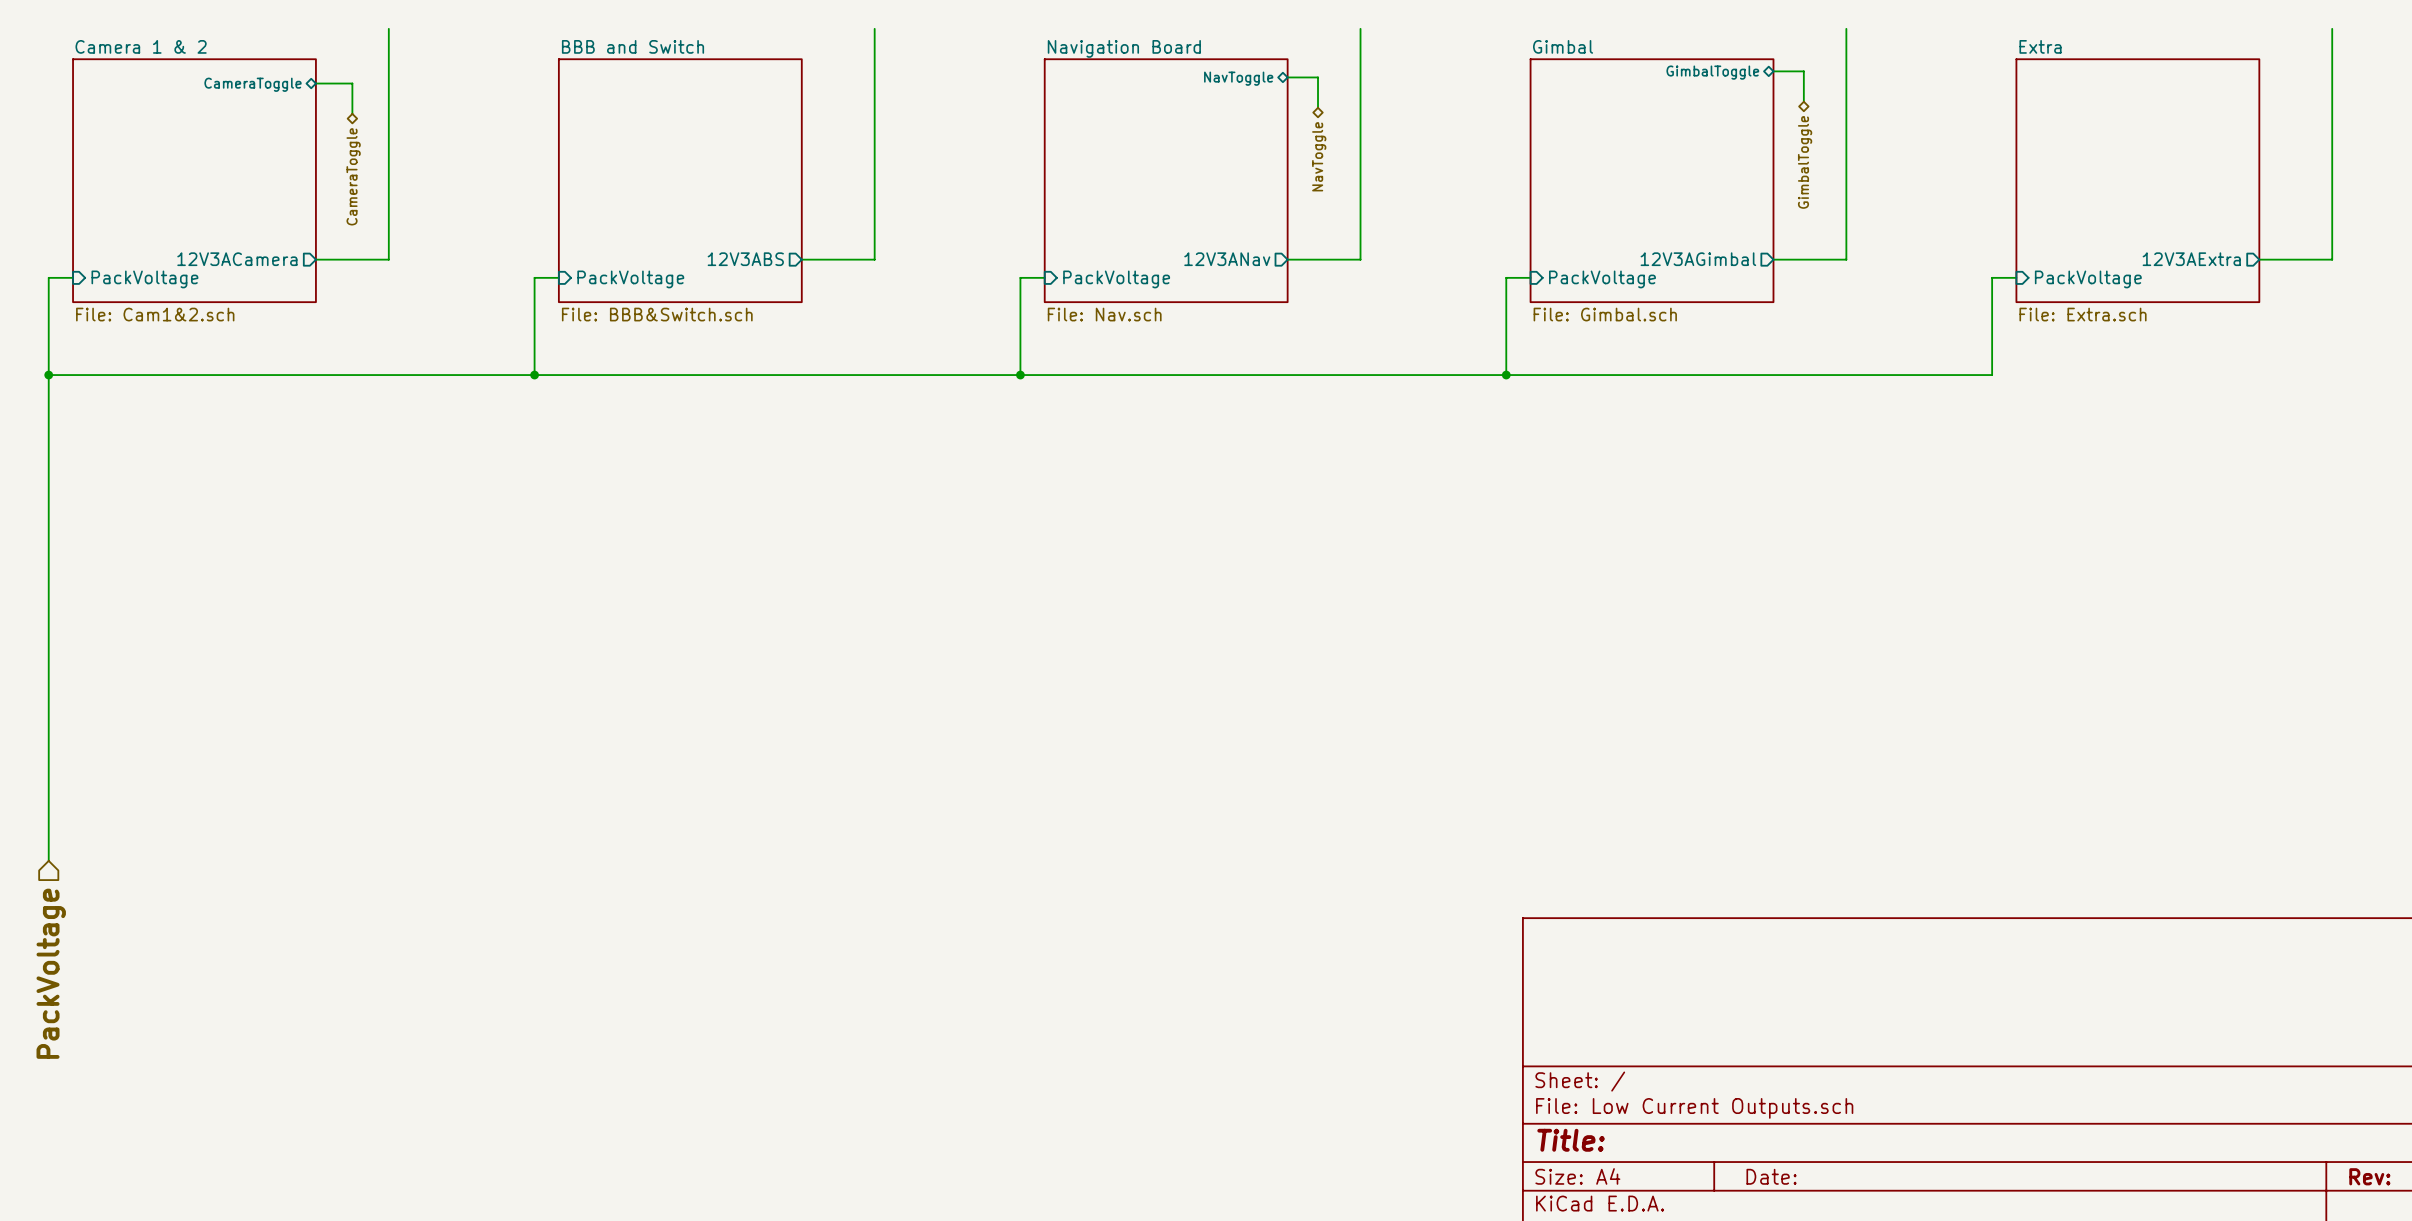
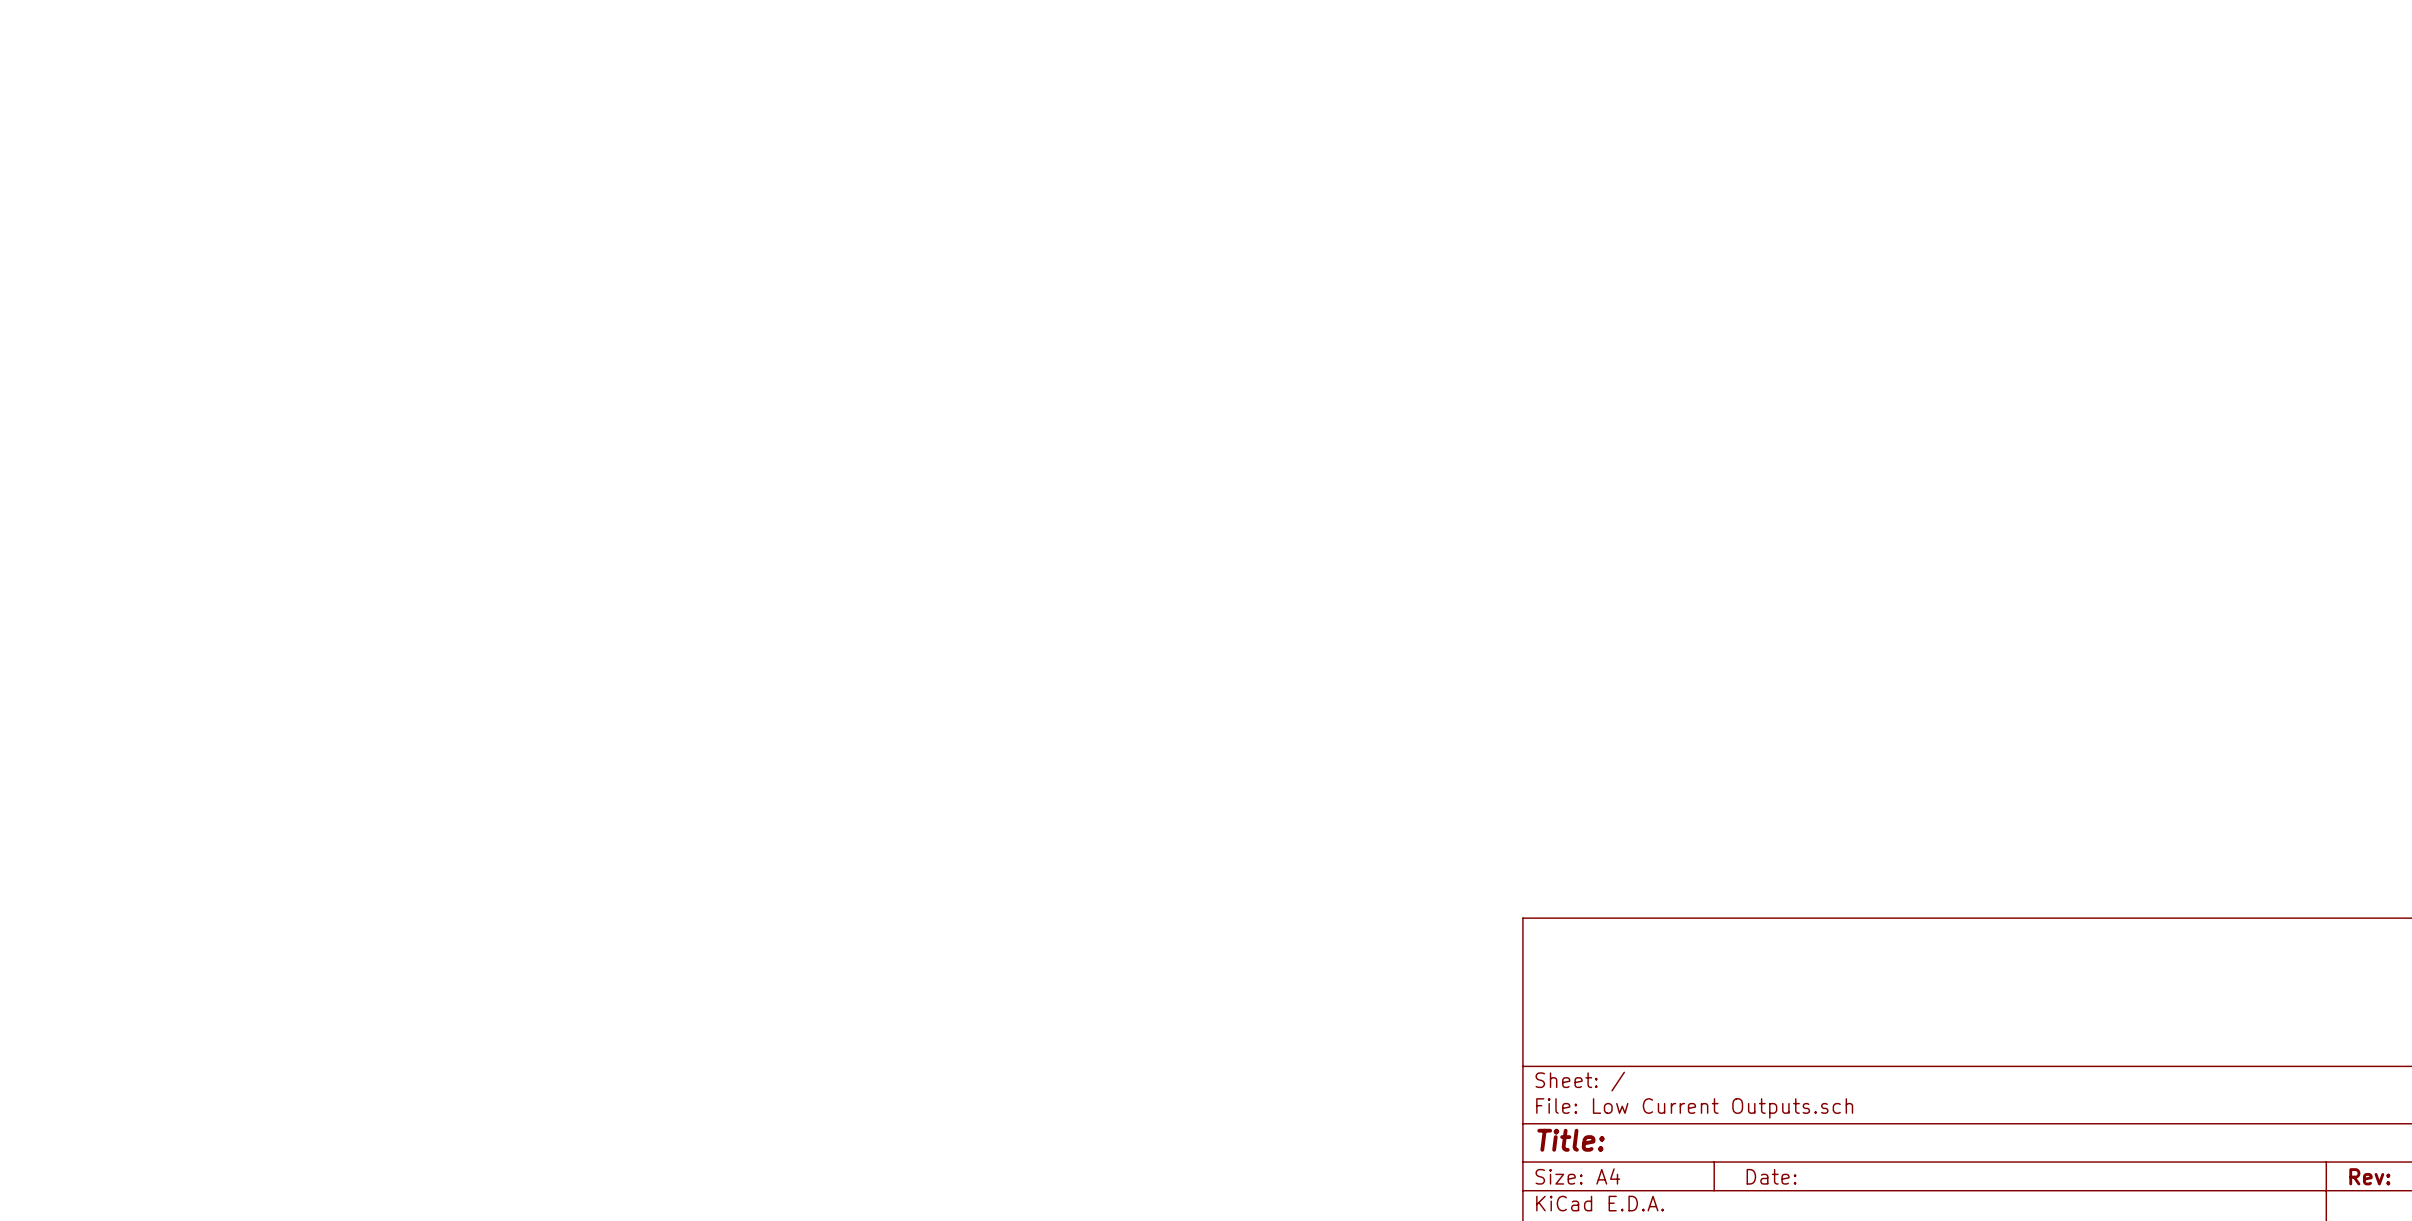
wire: (388, 28) (388, 259) (315, 259) -> none
wire: (874, 28) (874, 259) (801, 259) -> none
wire: (1360, 28) (1360, 259) (1287, 259) -> none
wire: (1846, 28) (1846, 259) (1773, 259) -> none
wire: (2332, 28) (2332, 259) (2259, 259) -> none
wire: (1773, 71) (1803, 71) (1803, 101) -> none
sheet pin: GimbalToggle (1712, 72) -> none
wire: (1287, 77) (1318, 77) (1318, 107) -> none
sheet pin: NavToggle (1238, 78) -> none
wire: (315, 83) (352, 83) (352, 113) -> none
sheet pin: CameraToggle (253, 84) -> none
hierarchical label: NavToggle (1319, 156) -> none
hierarchical label: GimbalToggle (1805, 162) -> none
hierarchical label: CameraToggle (353, 176) -> none
sheet Camera 1 & 2: File: Cam1&2.sch (194, 180) -> none
sheet BBB and Switch: File: BBB&Switch.sch (680, 180) -> none
sheet Navigation Board: File: Nav.sch (1166, 180) -> none
sheet Gimbal: File: Gimbal.sch (1652, 180) -> none
sheet Extra: File: Extra.sch (2137, 180) -> none
sheet pin: 12V3ACamera (237, 259) -> none
sheet pin: 12V3ABS (745, 259) -> none
sheet pin: 12V3ANav (1227, 259) -> none
sheet pin: 12V3AGimbal (1698, 259) -> none
sheet pin: 12V3AExtra (2191, 259) -> none
wire: (73, 277) (48, 277) (48, 860) -> none
wire: (558, 277) (534, 277) (534, 375) -> none
wire: (1044, 277) (1020, 277) (1020, 375) -> none
wire: (1530, 277) (1506, 277) (1506, 375) -> none
wire: (2016, 277) (1992, 277) (1992, 375) (48, 375) -> none
sheet pin: PackVoltage (144, 279) -> none
sheet pin: PackVoltage (630, 279) -> none
sheet pin: PackVoltage (1116, 279) -> none
sheet pin: PackVoltage (1602, 279) -> none
sheet pin: PackVoltage (2088, 279) -> none
junction: (48, 375) -> none
junction: (534, 375) -> none
junction: (1020, 375) -> none
junction: (1506, 375) -> none
hierarchical label: PackVoltage (51, 973) -> none

